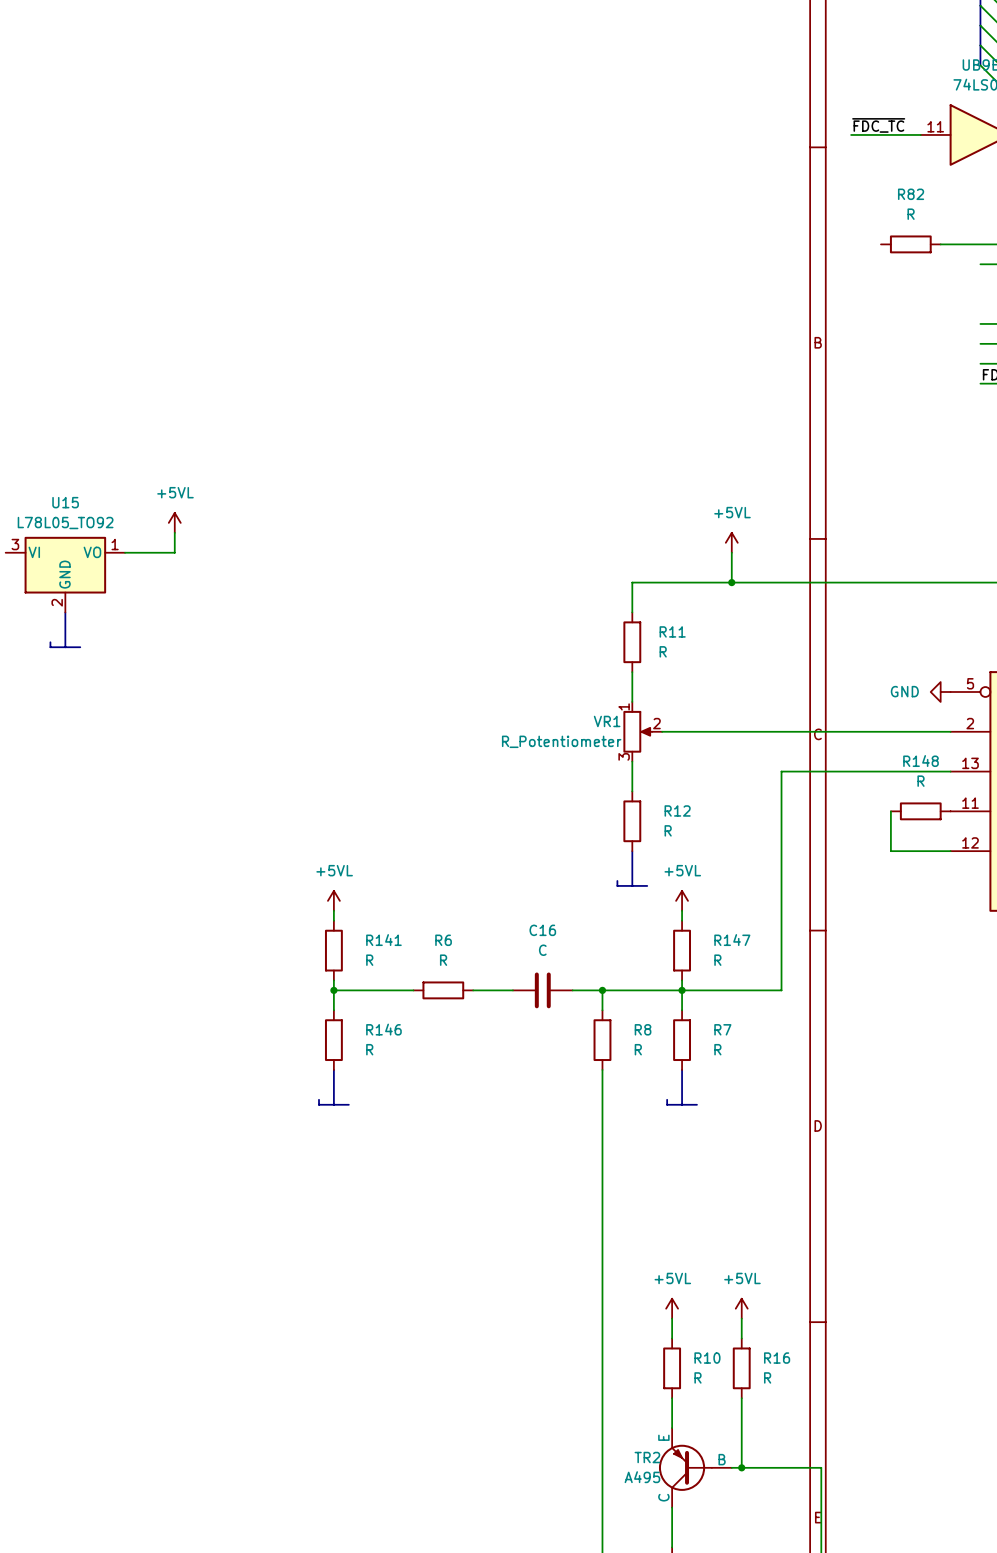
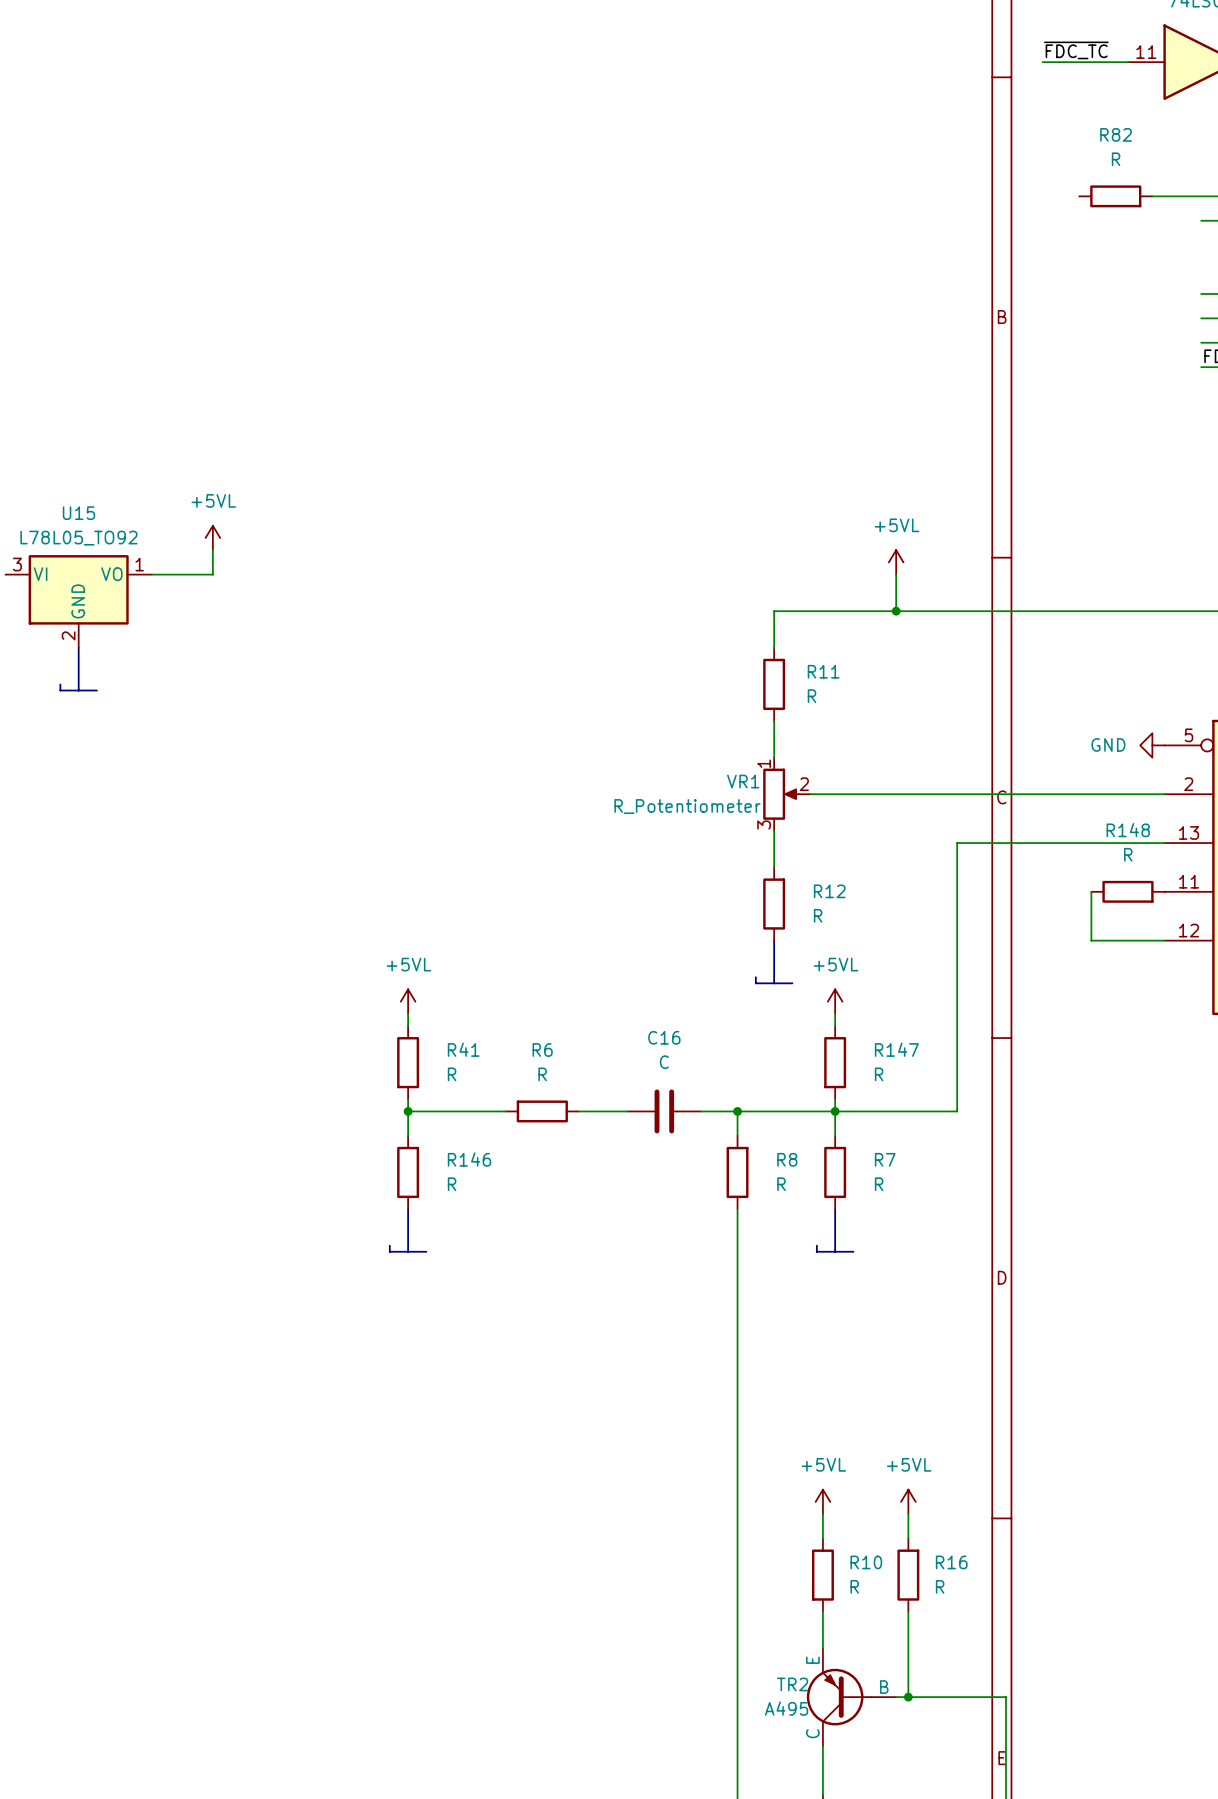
R141 name: R141 (383, 940) -> R41 (463, 1049)

